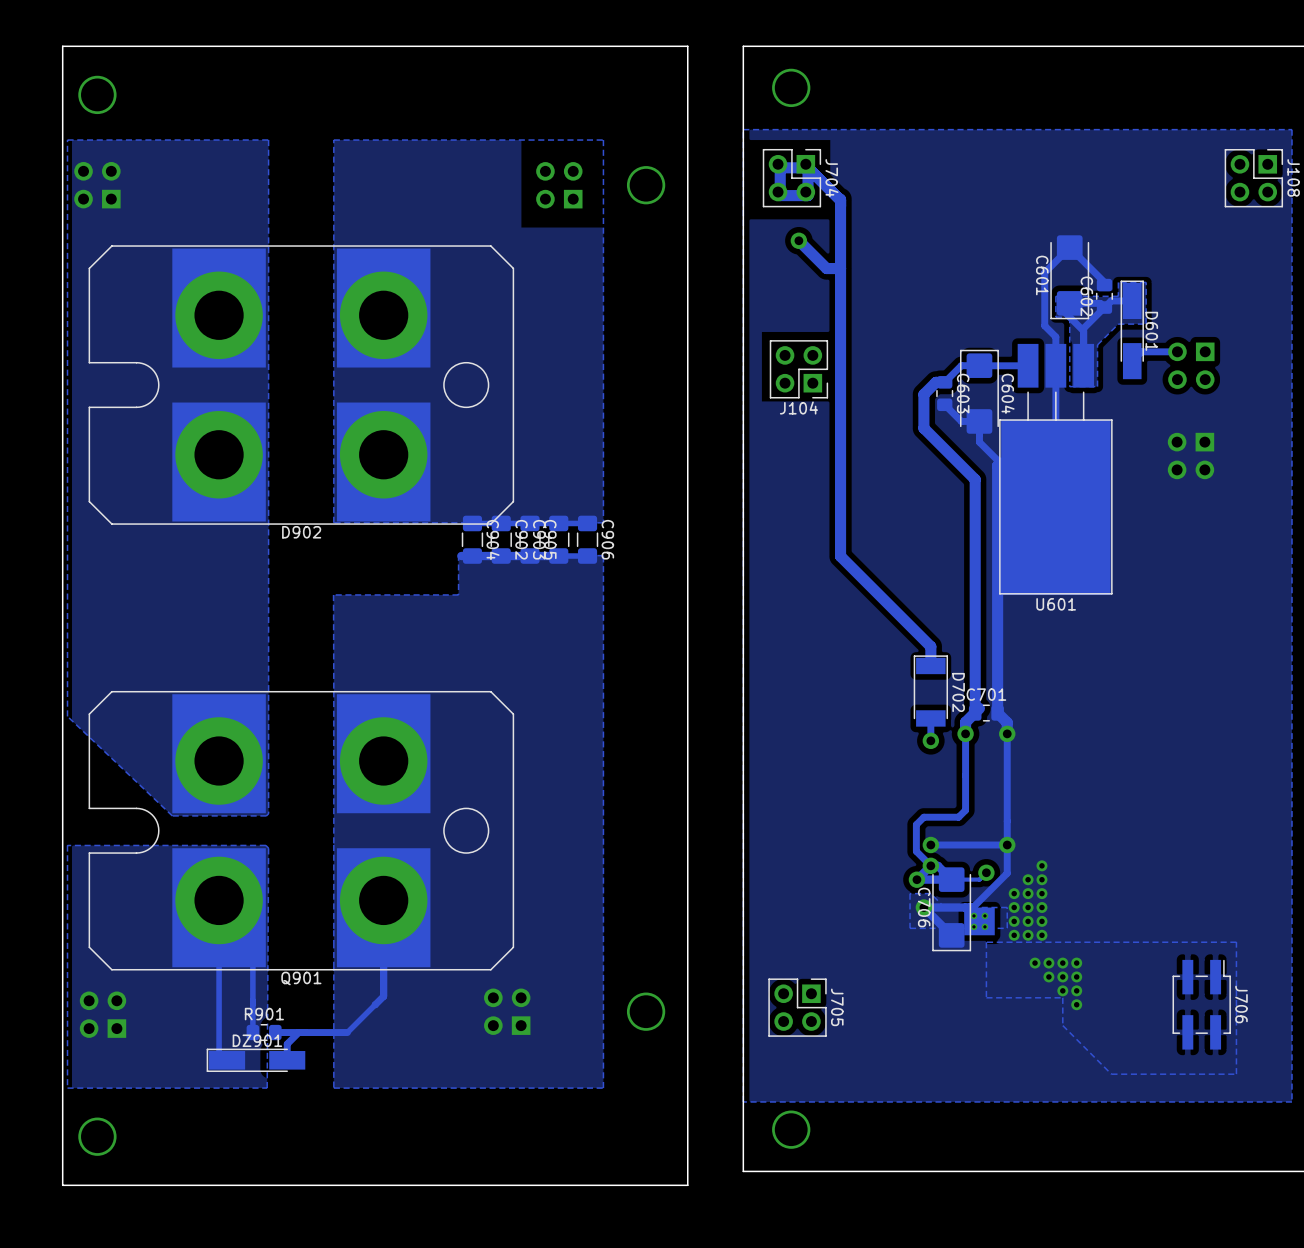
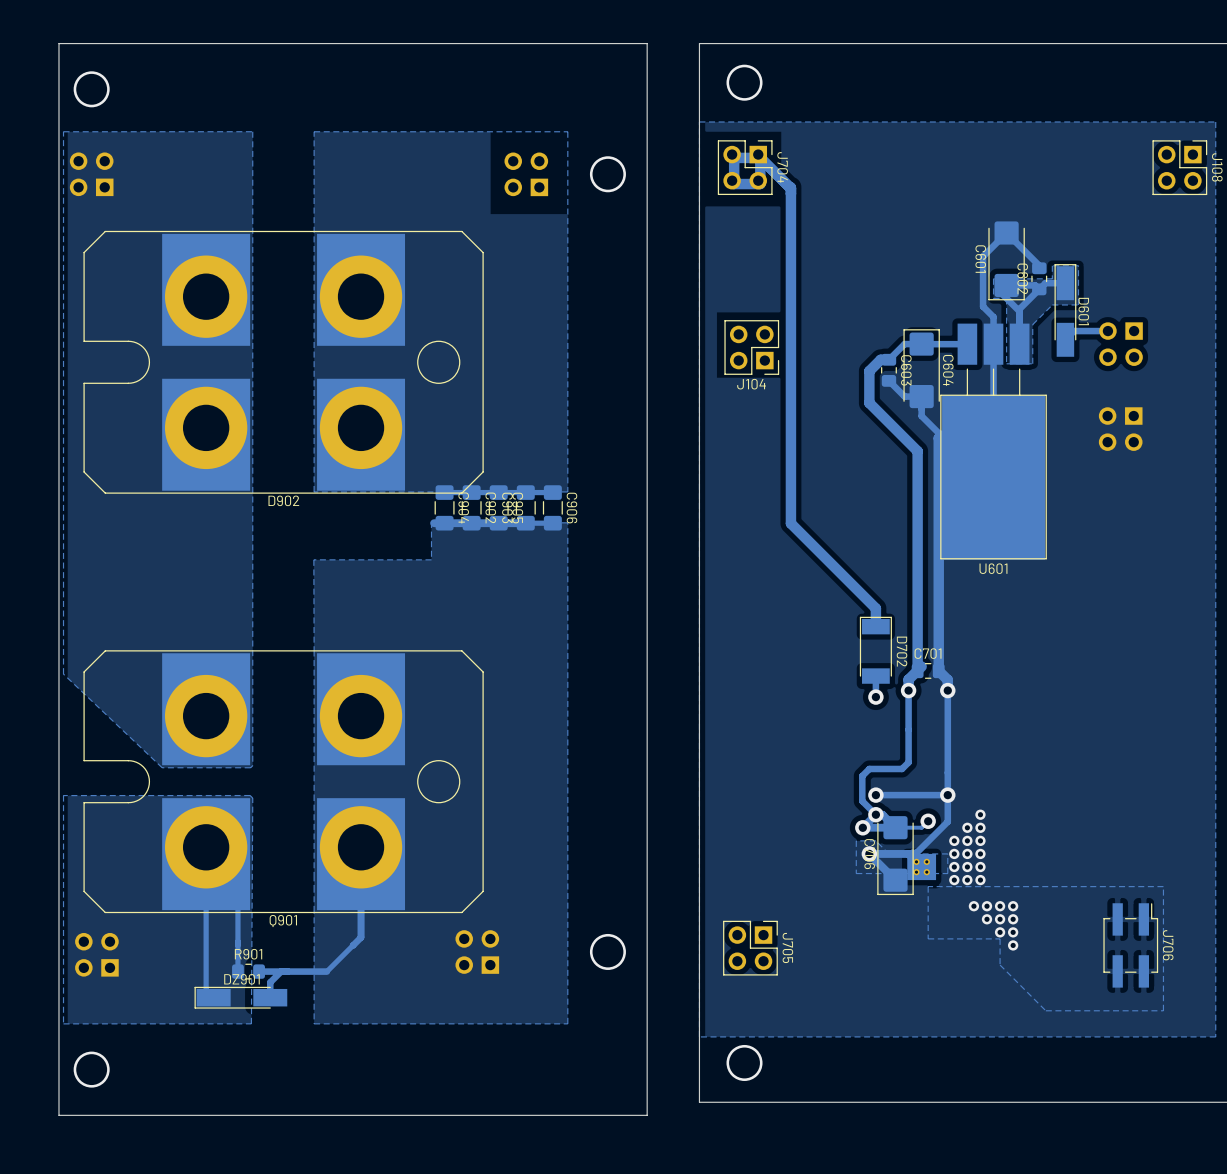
track: (798, 240) (826, 268) (840, 268) -> none
via: (798, 240) -> none

